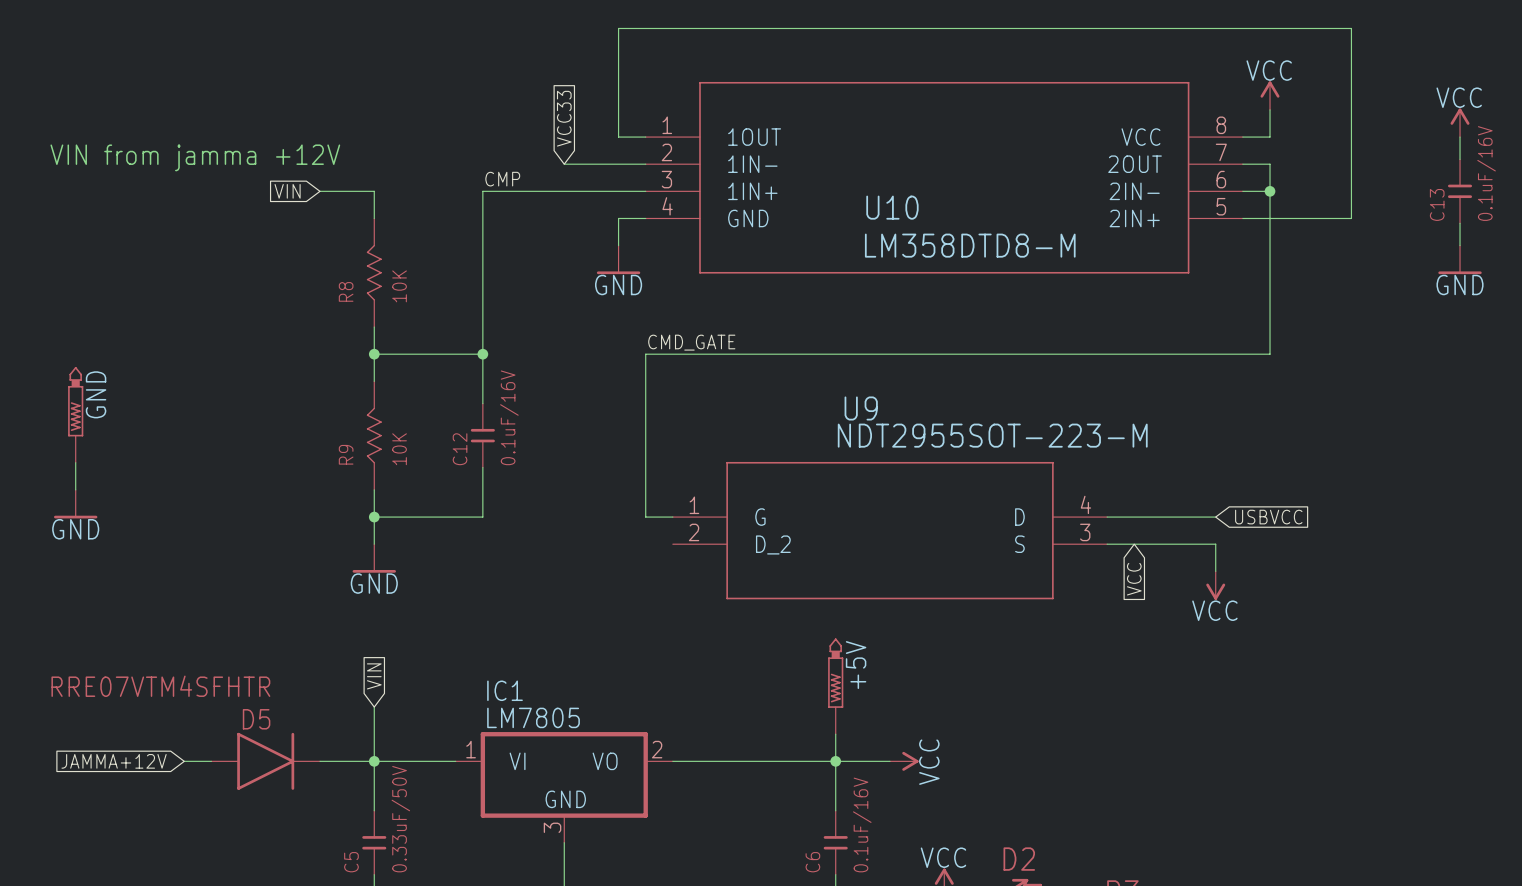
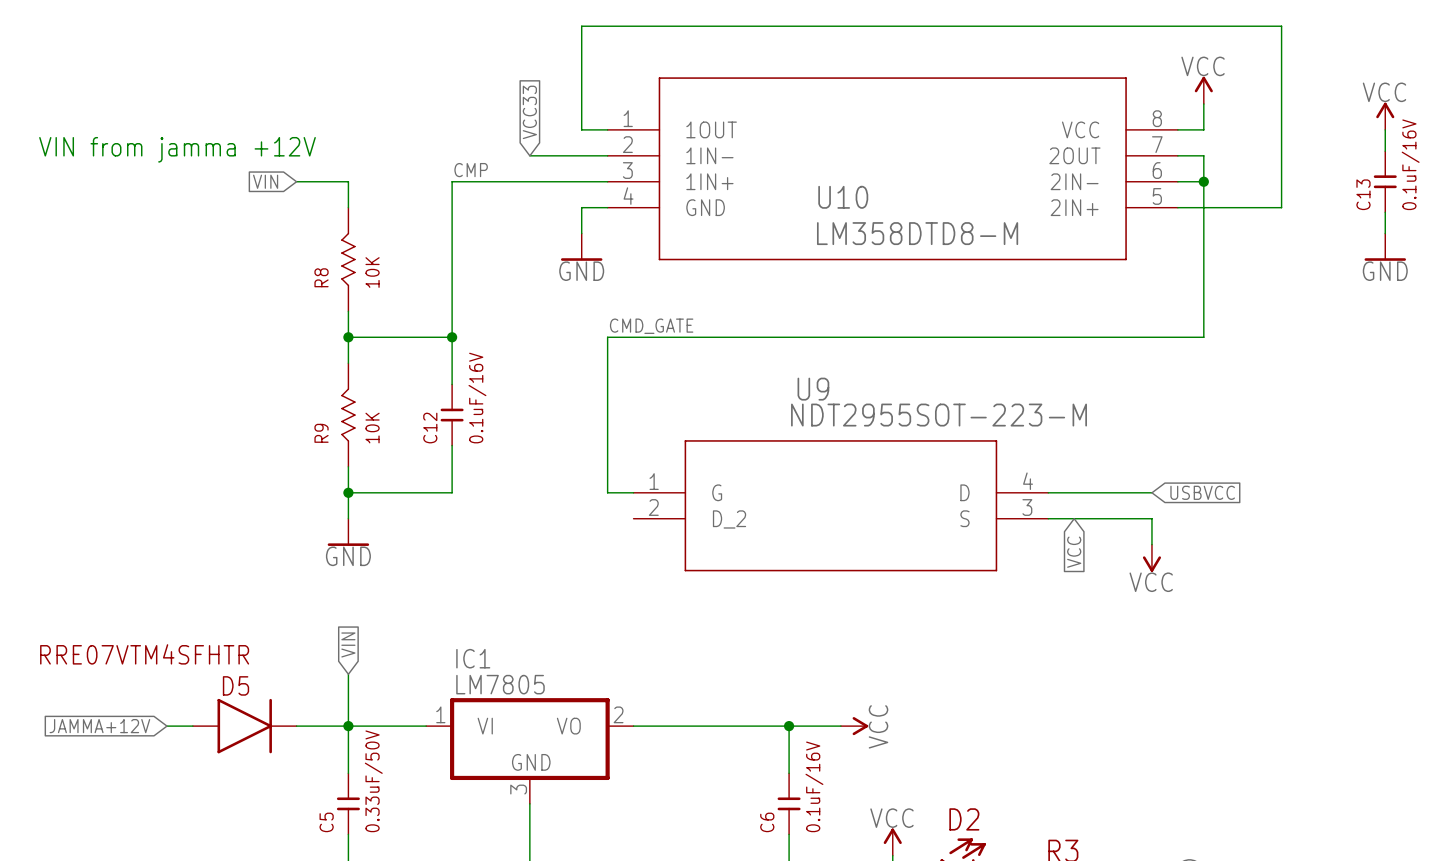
GND: (75, 414) -> none
wire: (75, 462) (75, 489) -> none
power symbol: GND (75, 504) -> none
+5V: (835, 686) -> none
wire: (835, 734) (835, 761) -> none

